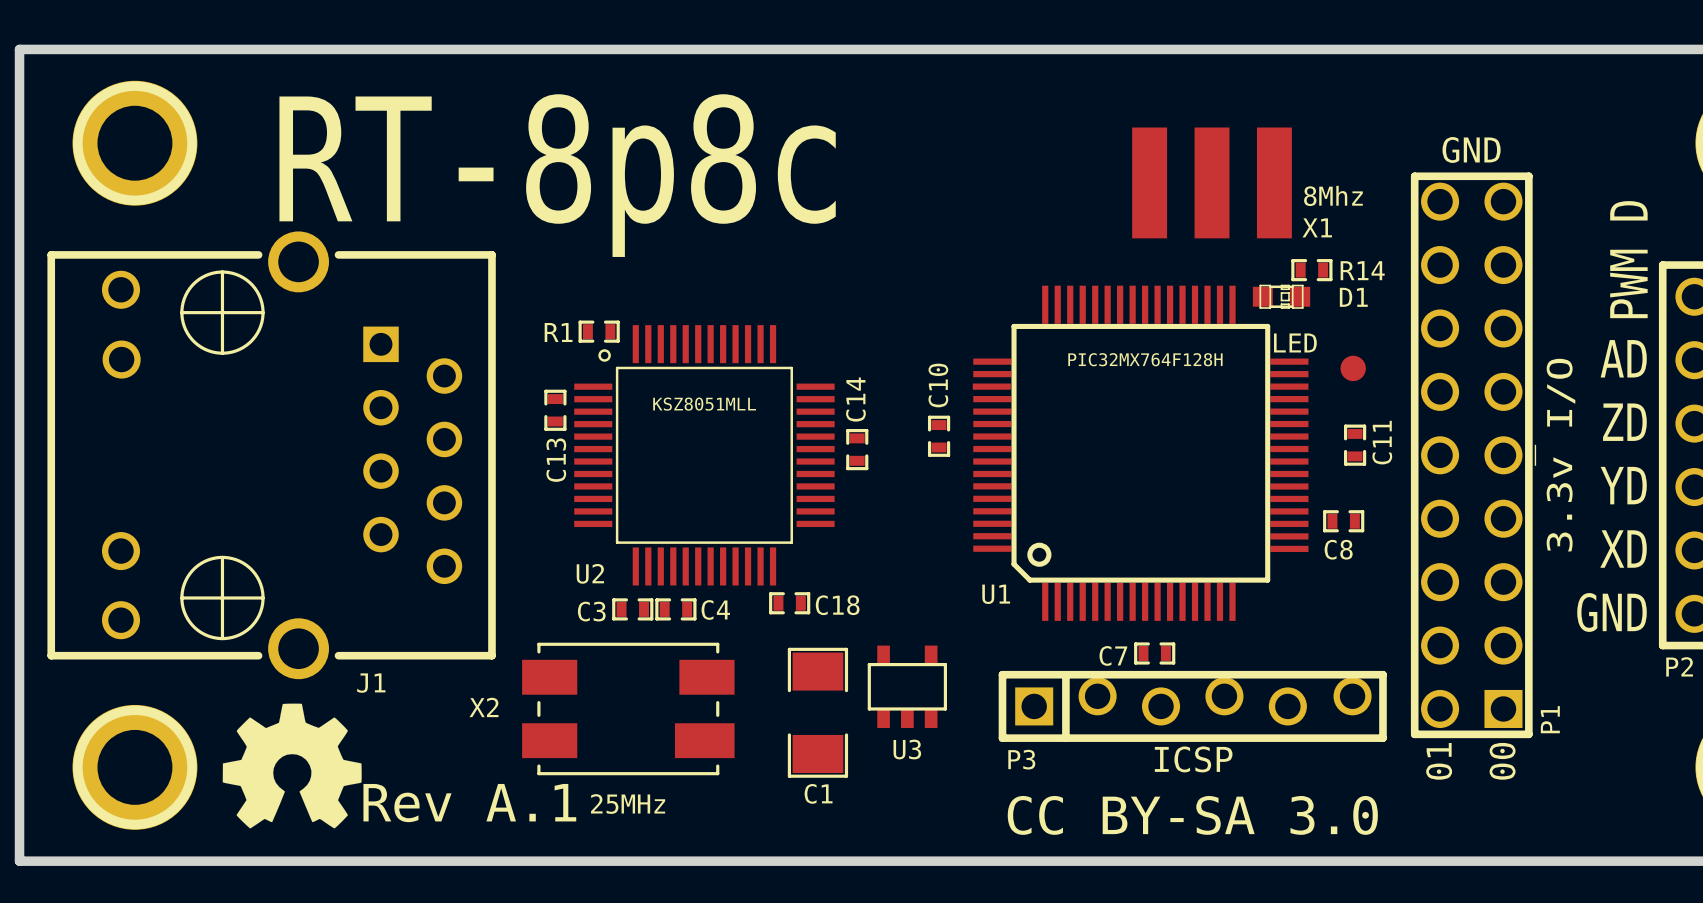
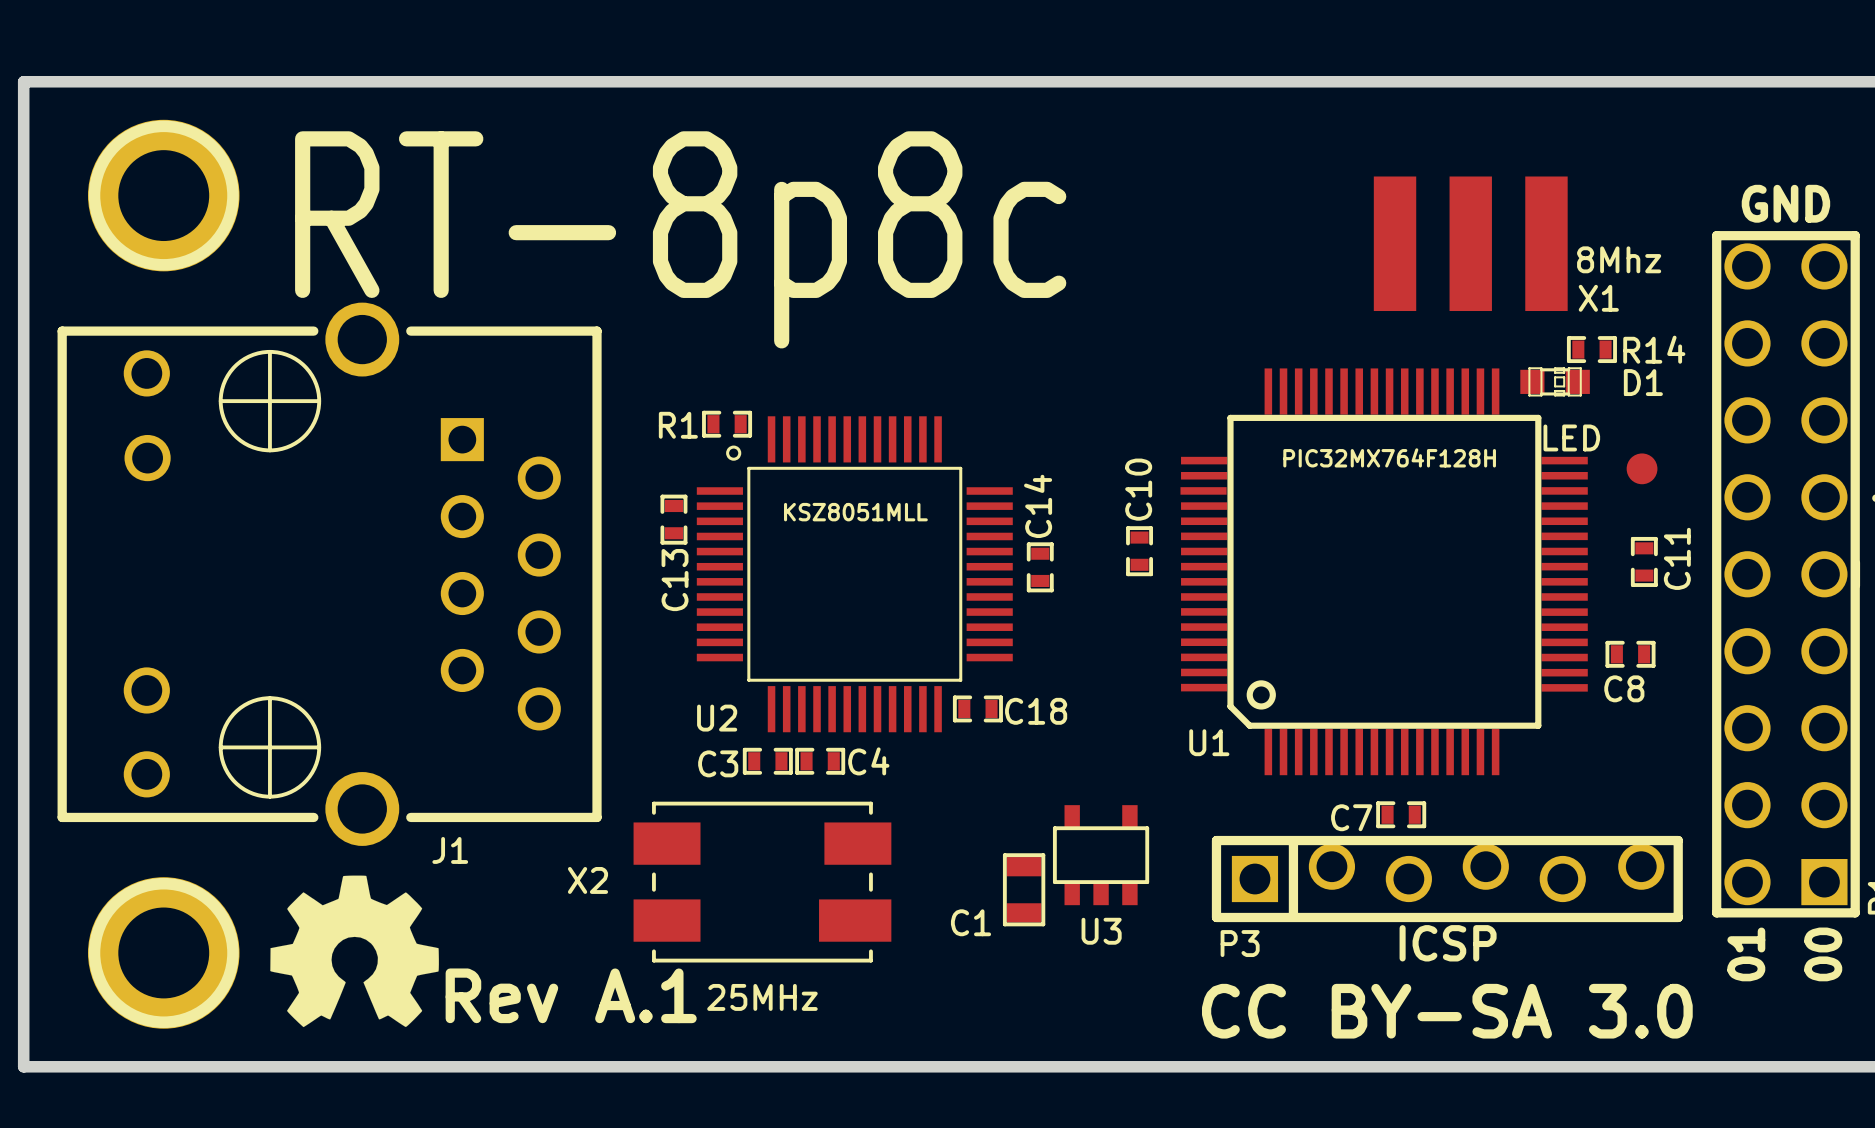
C18 position: (789, 603) -> (977, 708)
C1 footprint: [787, 647, 849, 778] -> [1002, 853, 1046, 927]
C1 name position: C1 (818, 793) -> C1 (971, 922)

